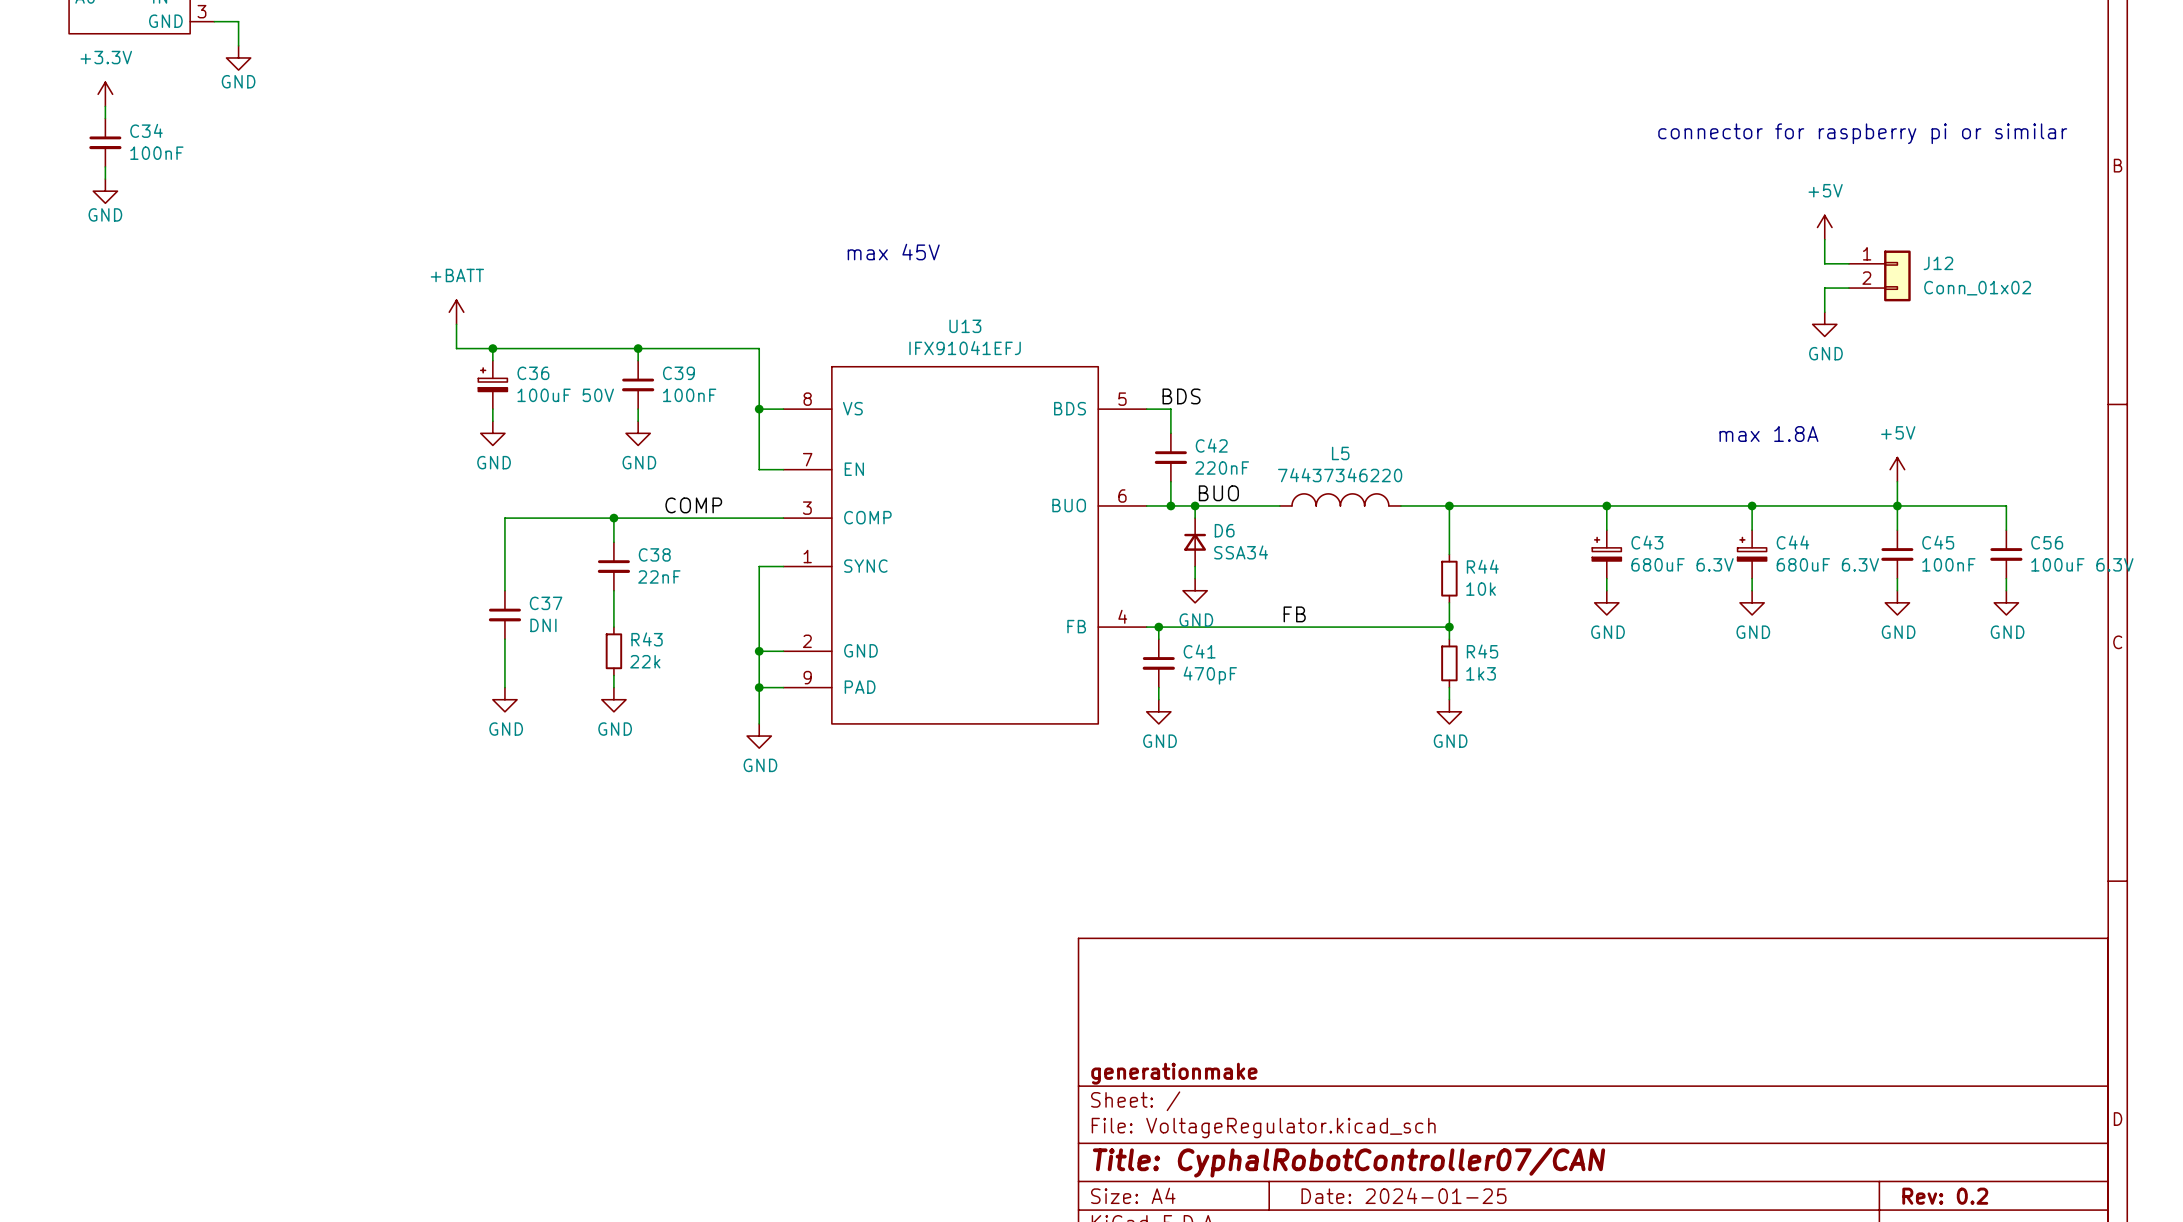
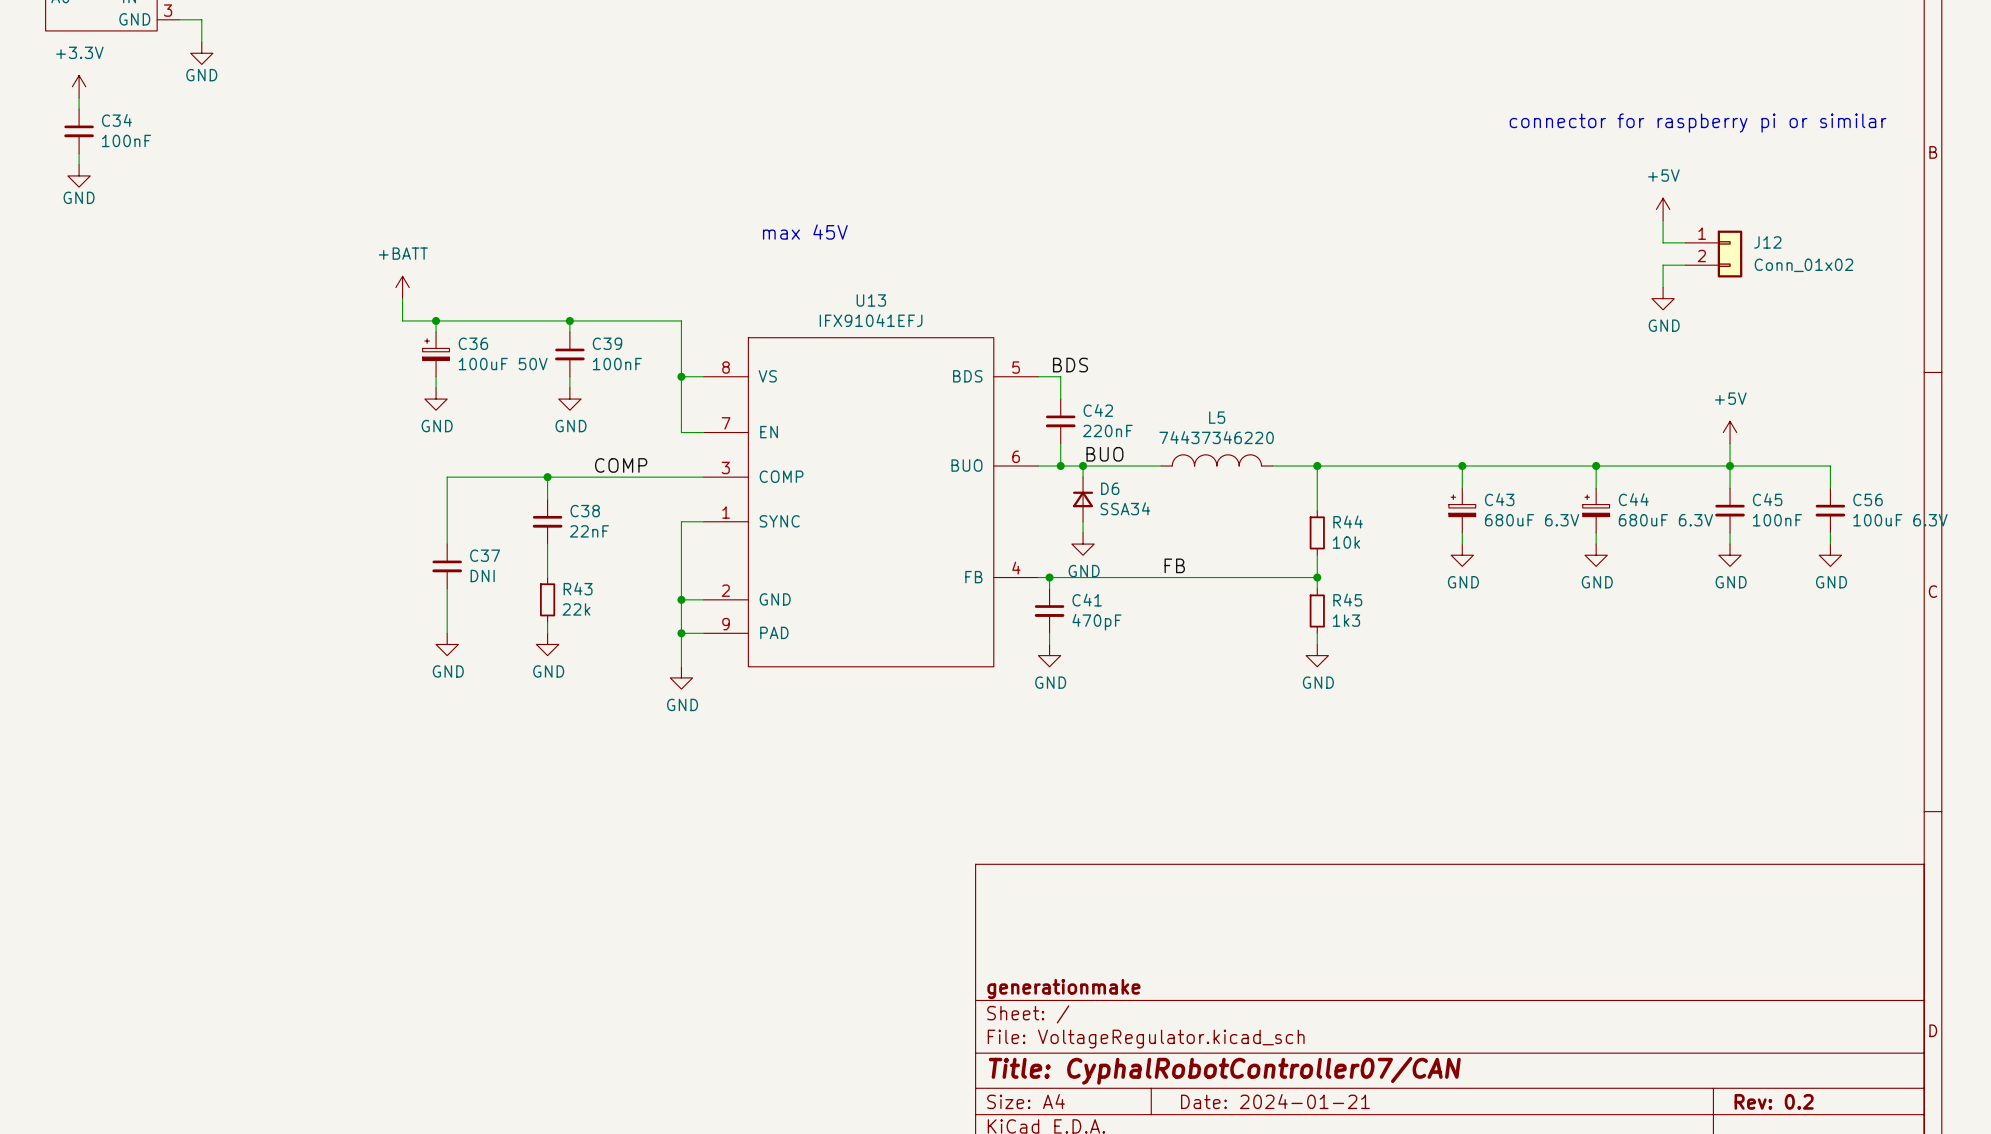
text: max 1.8A (1768, 434) -> none
title block: Date: 2024-01-25 (1403, 1195) -> Date: 2024-01-21 (1275, 1101)

